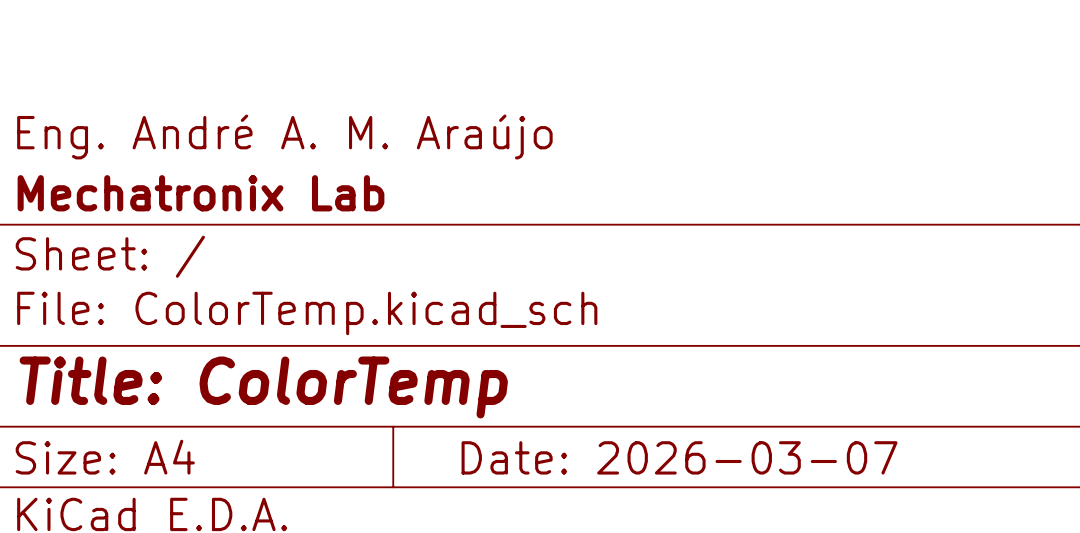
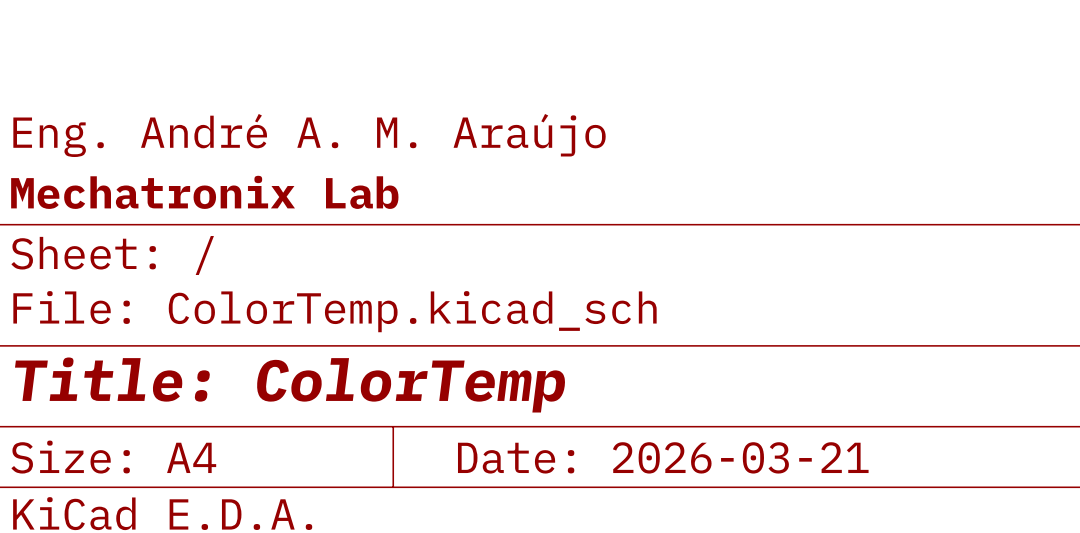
title block: Date: 2026-03-07 (679, 457) -> Date: 2026-03-21 (663, 457)

